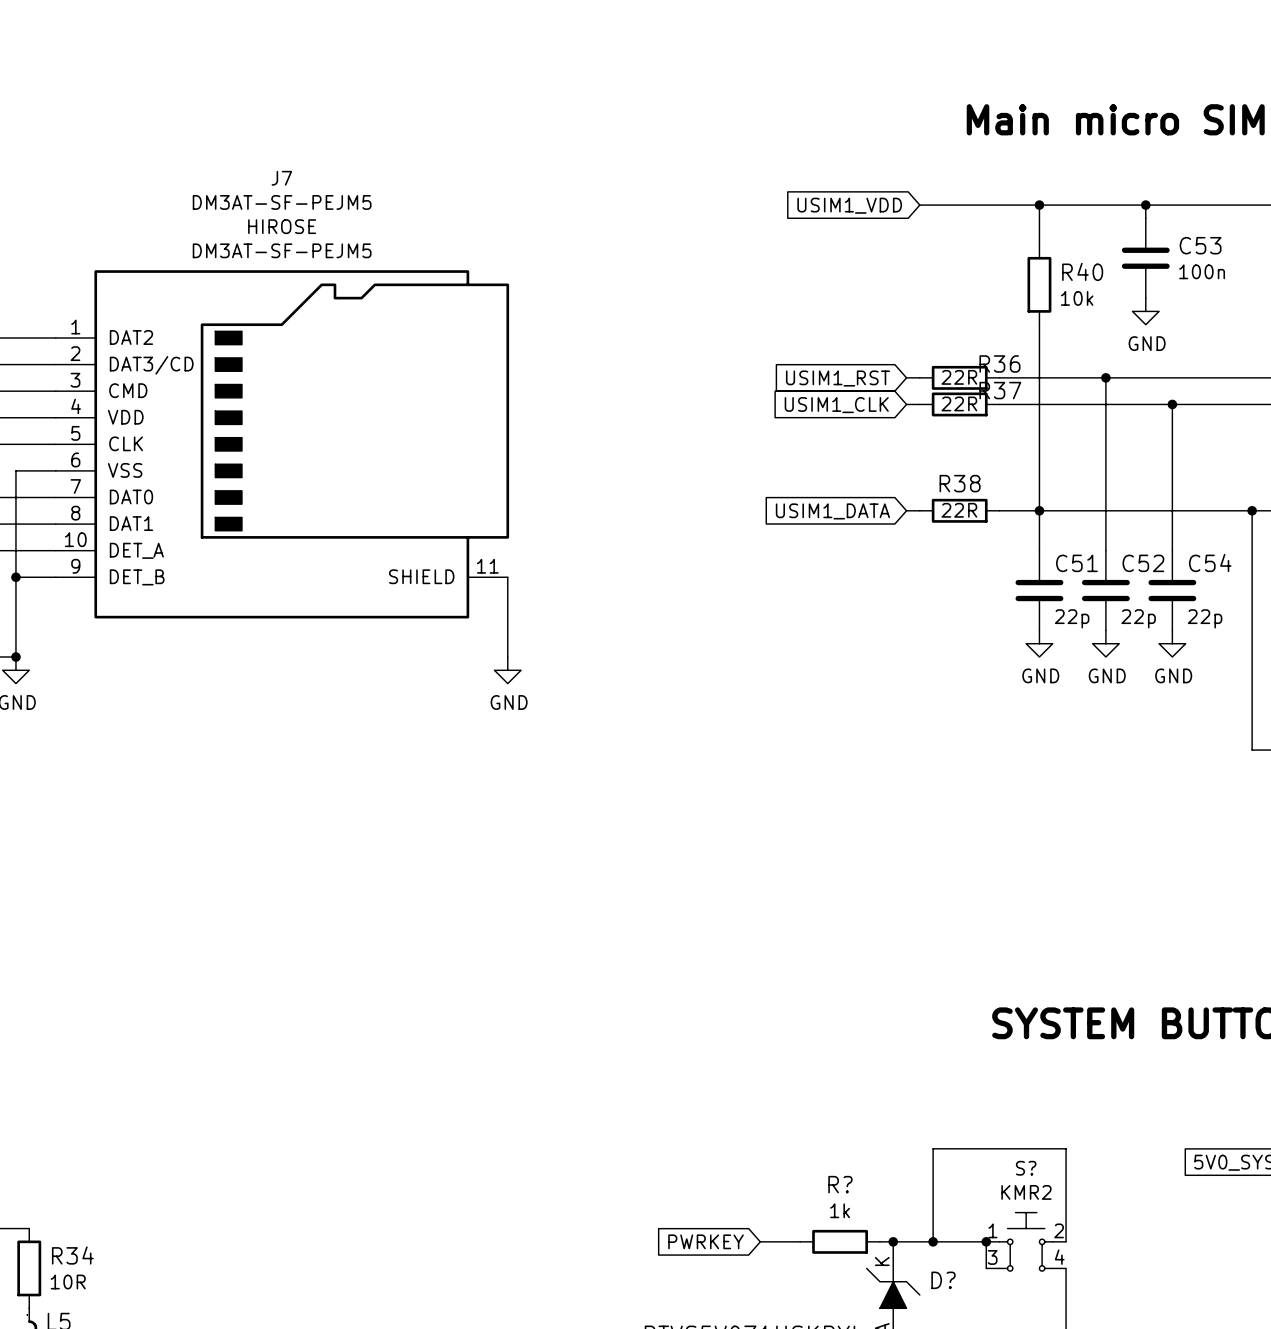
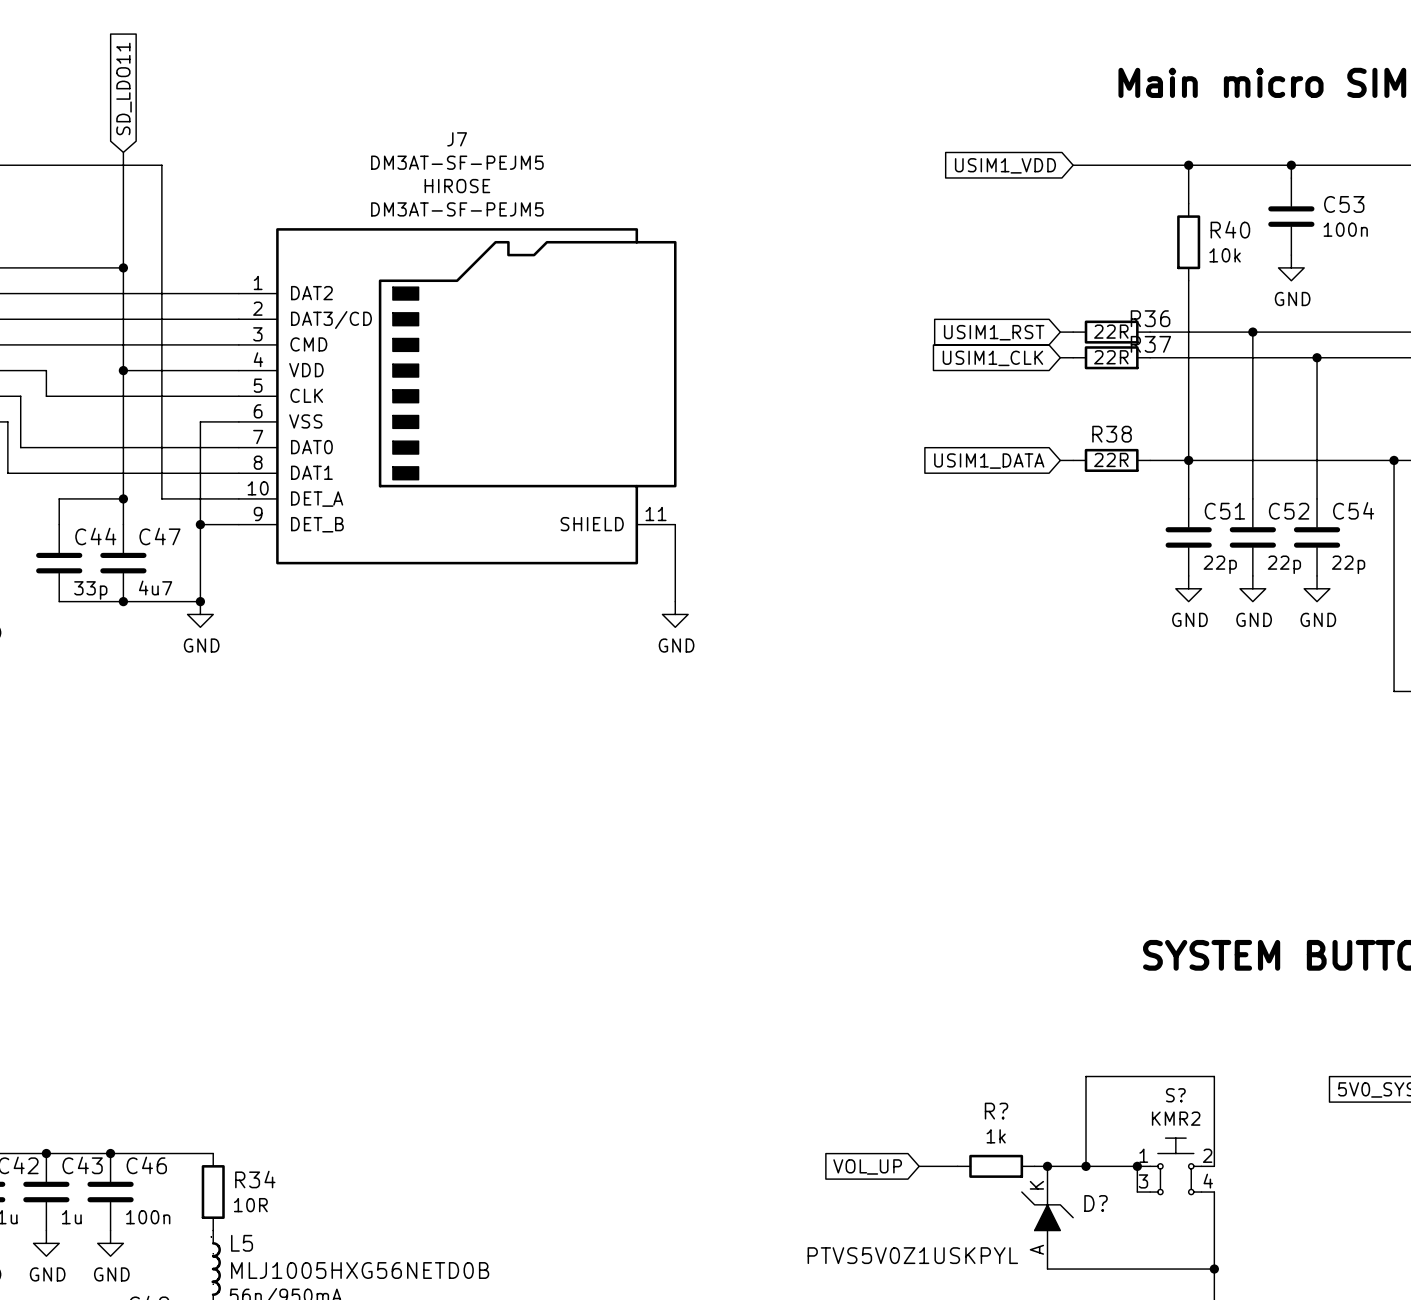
global label: PWRKEY (706, 1241) -> VOL_UP (867, 1166)

